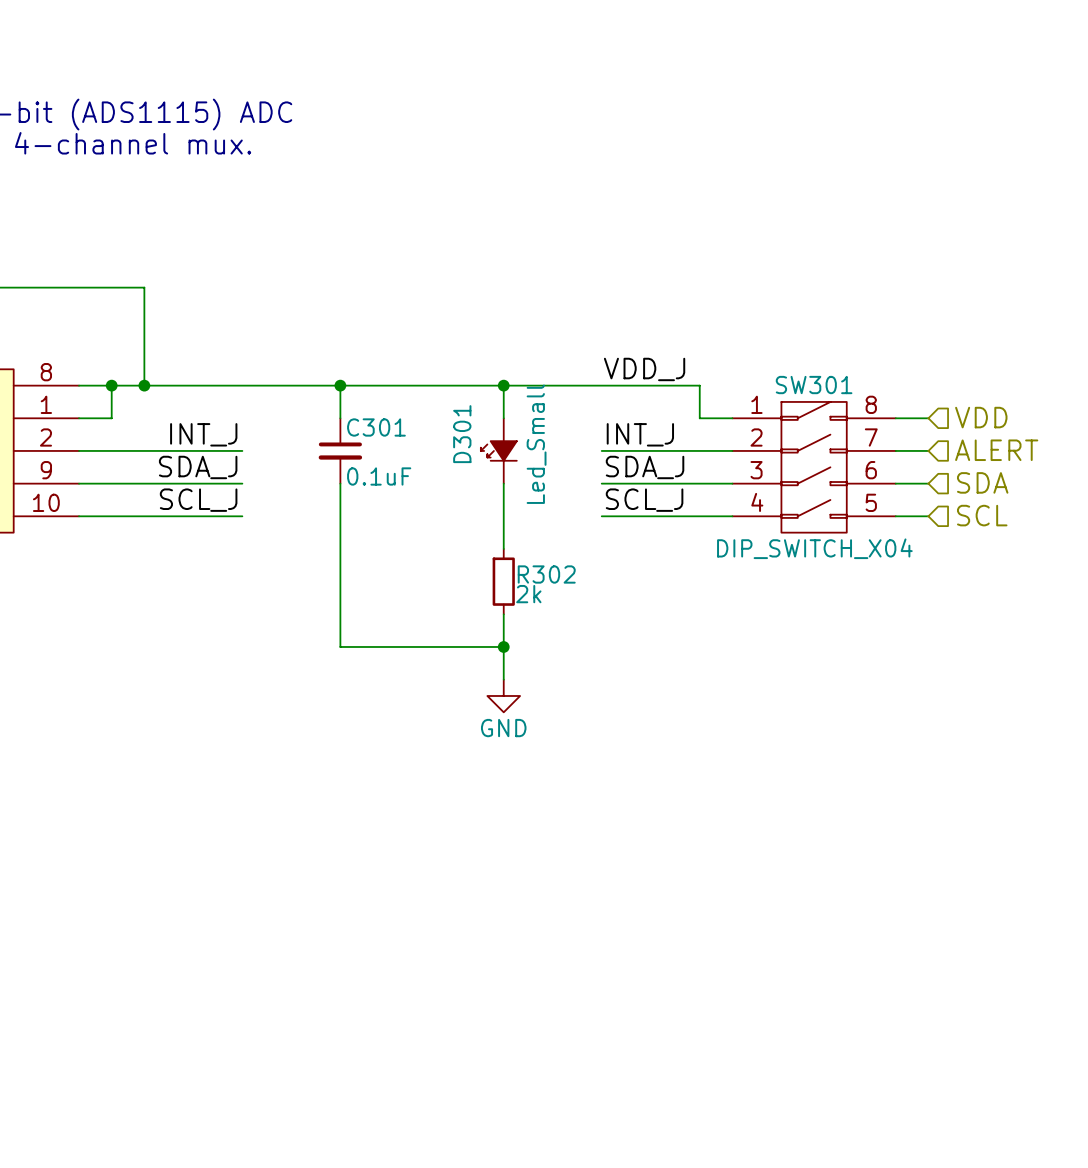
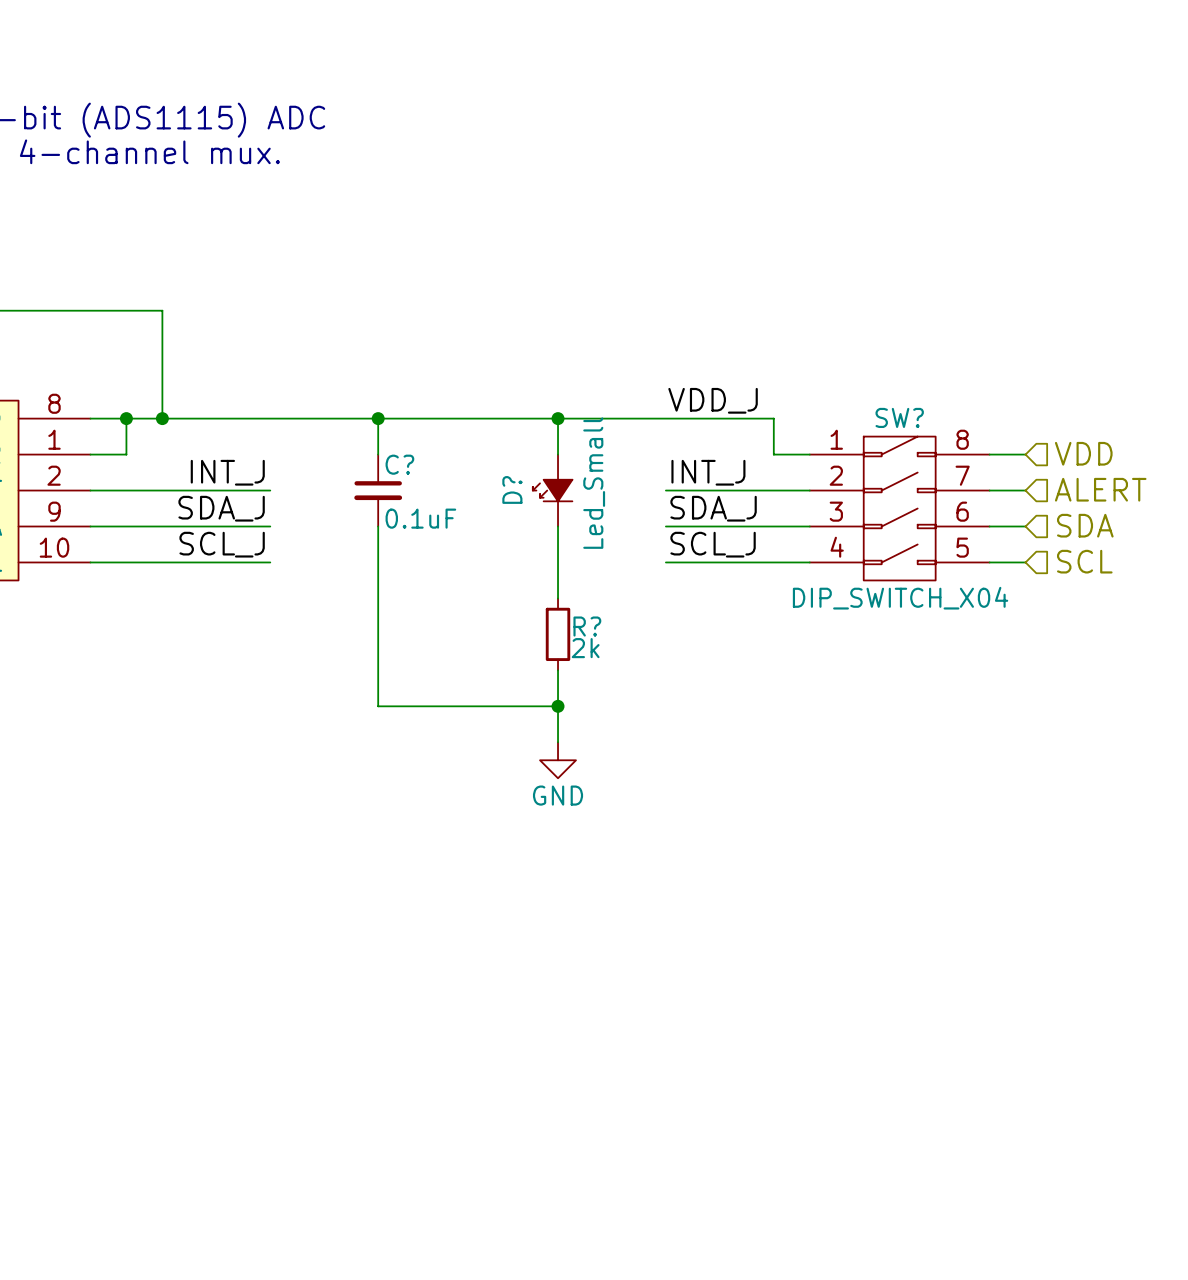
SW301 name: SW301 (814, 385) -> SW? (899, 417)
C301 name: C301 (376, 427) -> C? (399, 464)
D301 name: D301 (462, 434) -> D? (512, 489)
R302 name: R302 (546, 574) -> R? (587, 626)

